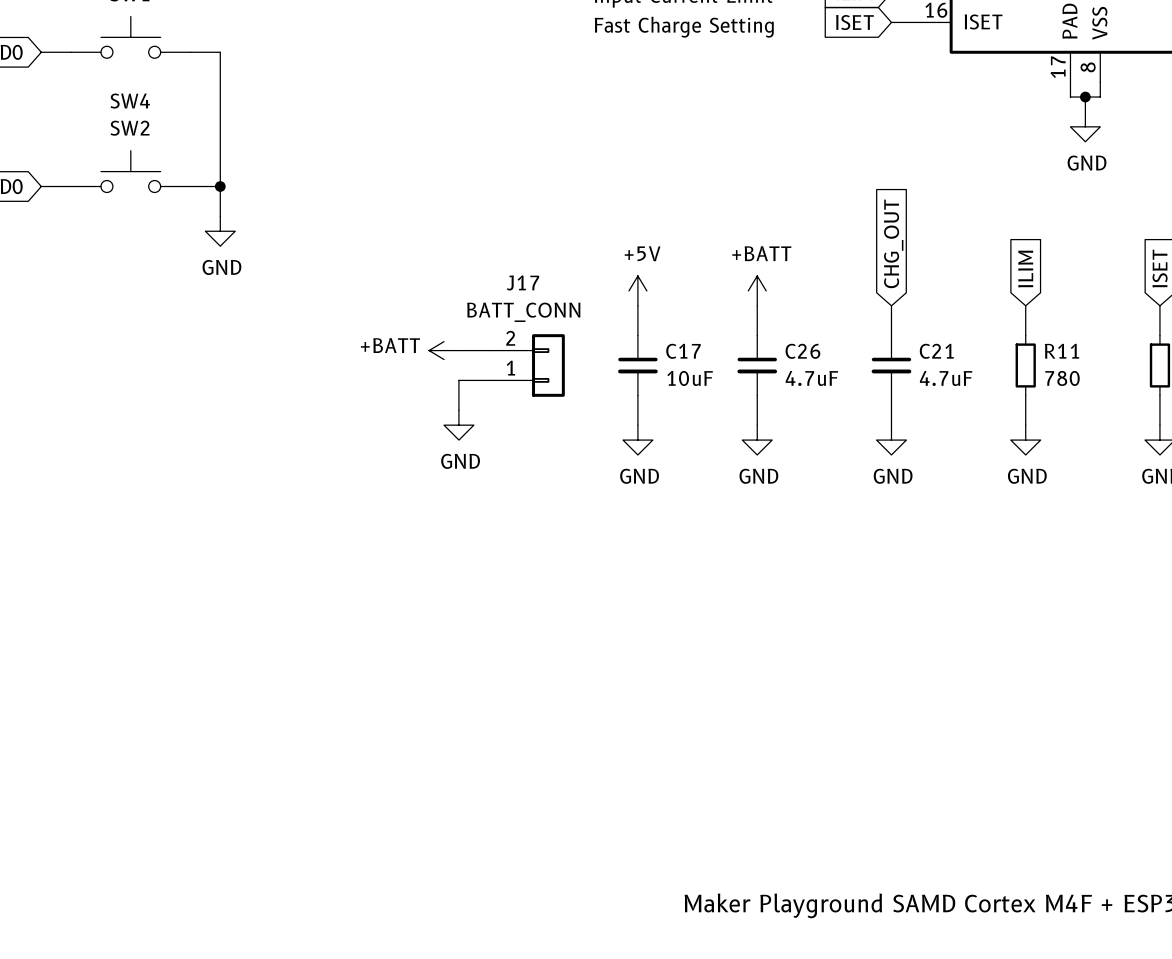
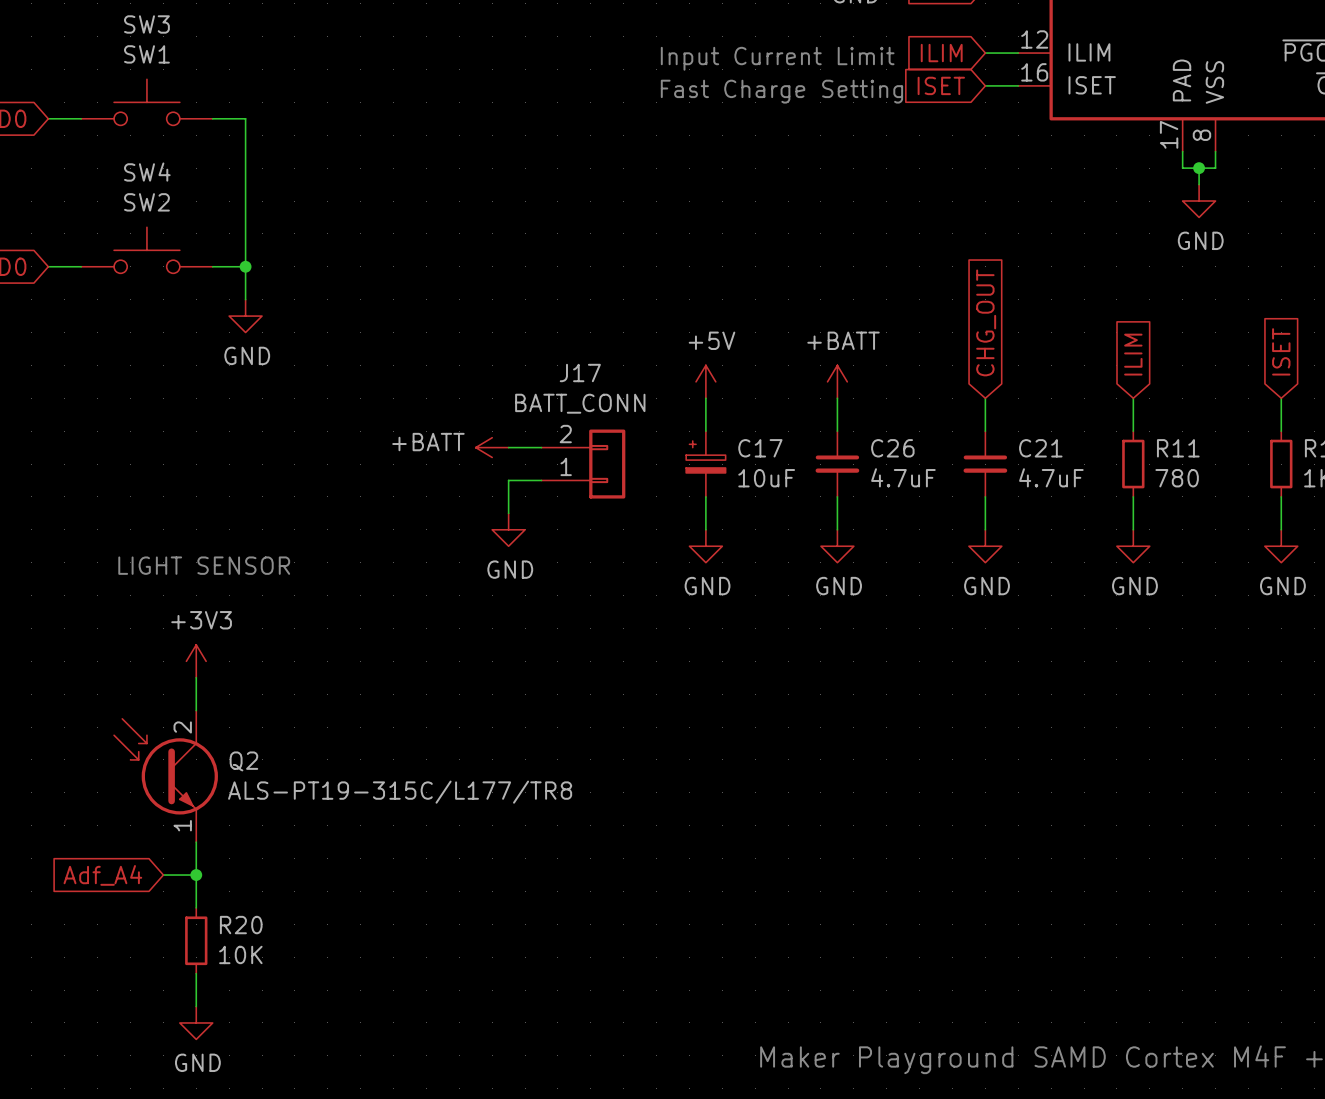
C17 symbol: [618, 335, 658, 396] -> [686, 431, 726, 497]
text: none -> LIGHT SENSOR (204, 565)
power symbol: none -> +3V3 (196, 661)
wire: none -> (196, 677) (196, 710)
Q2: none -> ALS-PT19-315C/L177/TR8 (166, 776)
wire: none -> (196, 842) (196, 907)
wire: none -> (163, 875) (196, 875)
junction: none -> (196, 875)
global label: none -> Adf_A4 (102, 875)
R20: none -> 10K (196, 940)
wire: none -> (196, 973) (196, 1006)
power symbol: none -> GND (196, 1022)

